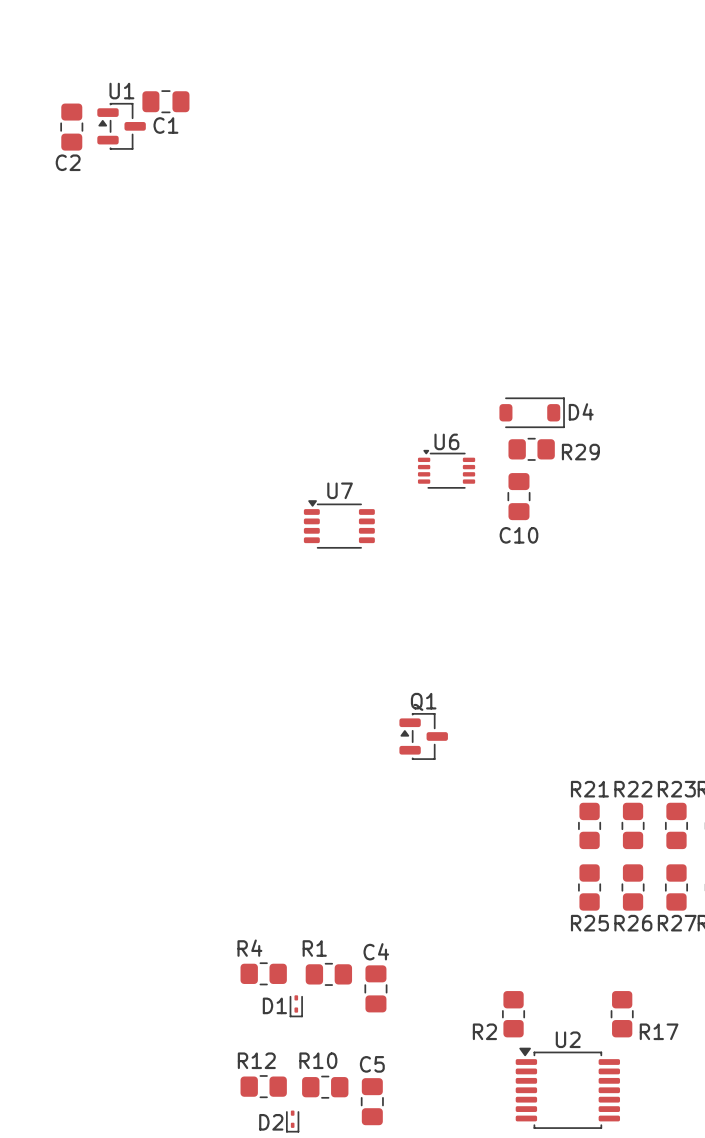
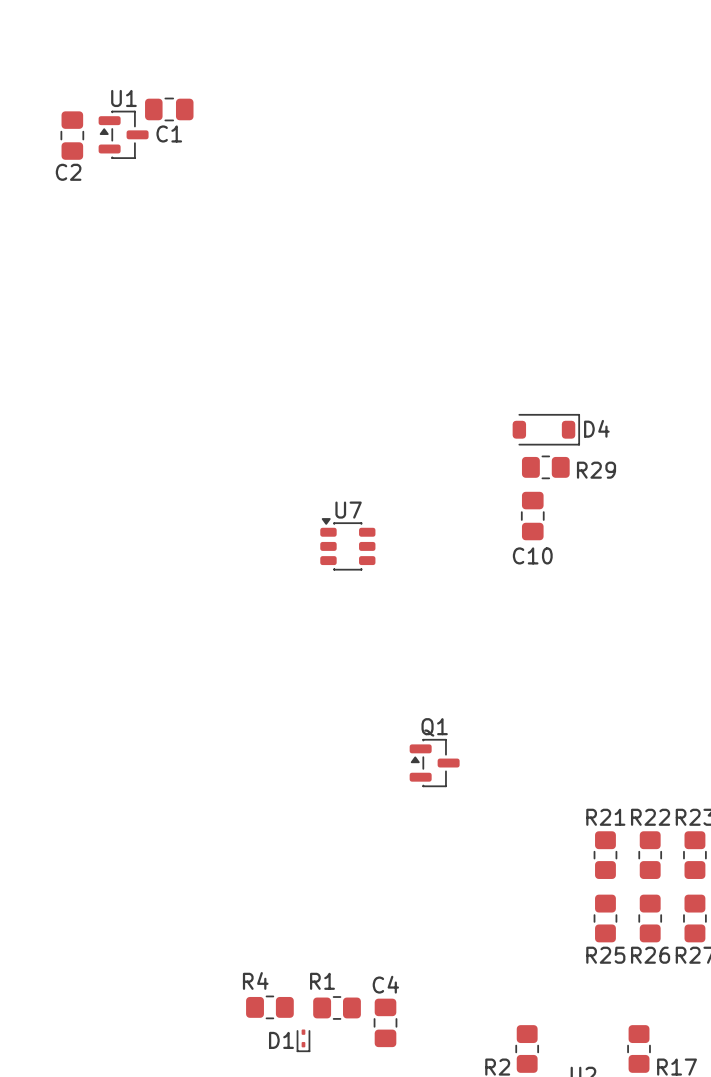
U6: (446, 469) -> none
U7 footprint: [303, 500, 375, 549] -> [320, 518, 376, 571]

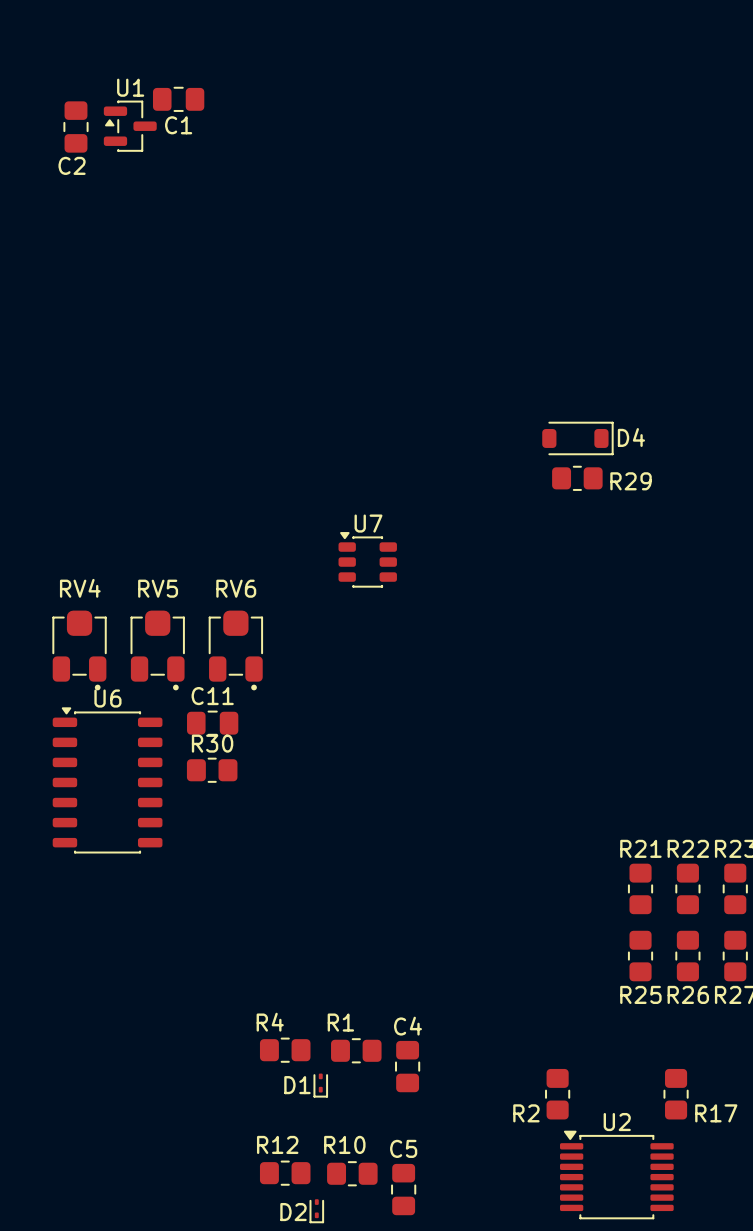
C10: (532, 516) -> none
RV4: none -> (79, 650)
RV5: none -> (157, 650)
RV6: none -> (235, 650)
C11: none -> (212, 723)
R30: none -> (212, 770)
U6: none -> (107, 780)
Q1: (434, 763) -> none

